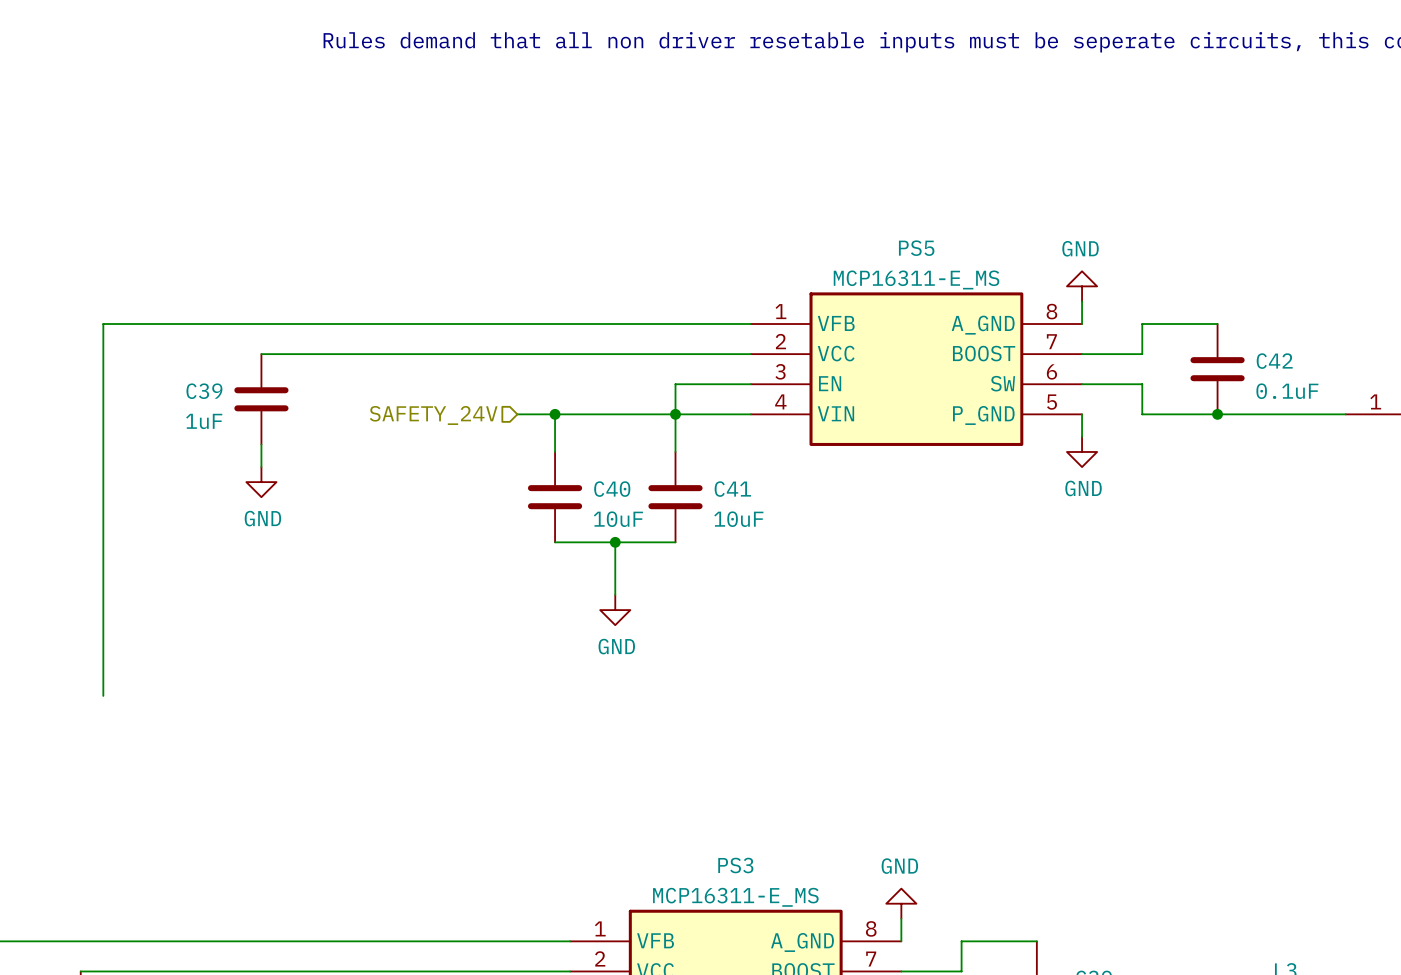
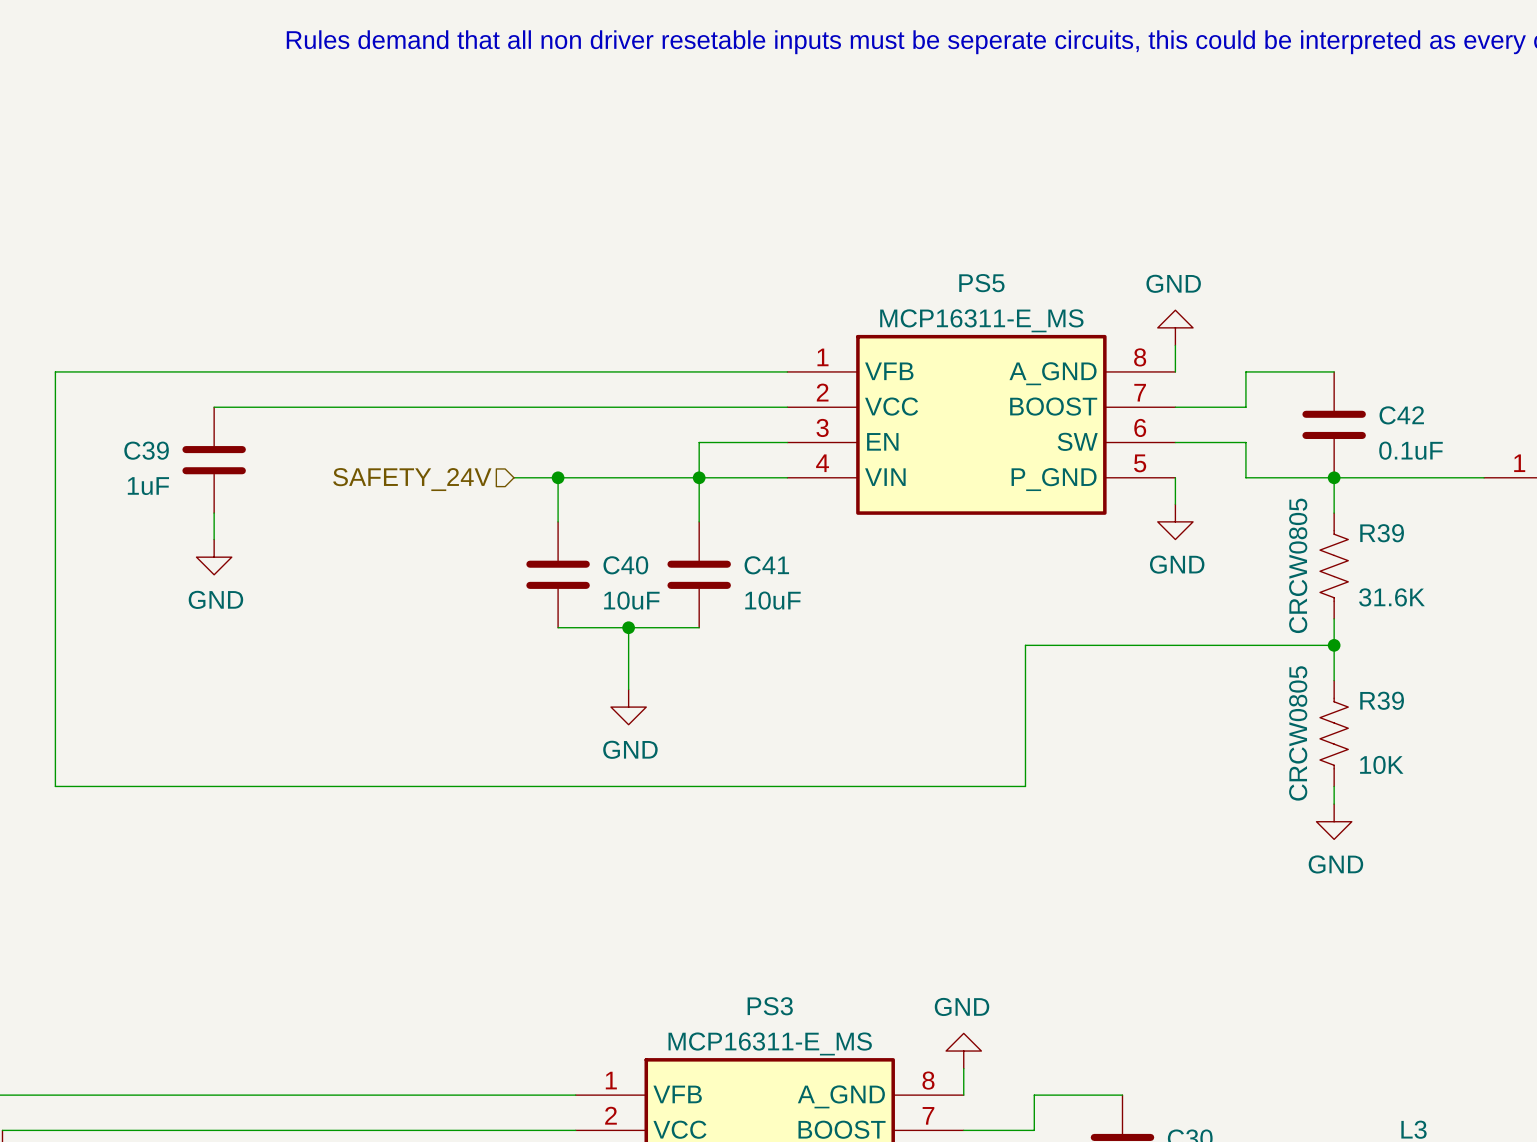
wire: (125, 324) (103, 324) (103, 695) -> (55, 371) (55, 786) (1025, 786) (1025, 645) (1334, 645)
wire: none -> (1334, 477) (1334, 513)
R39: none -> CRCW0805 (1334, 565)
wire: none -> (1334, 618) (1334, 680)
junction: none -> (1334, 645)
R39: none -> CRCW0805 (1334, 733)
wire: none -> (1334, 786) (1334, 804)
power symbol: none -> GND (1334, 821)

